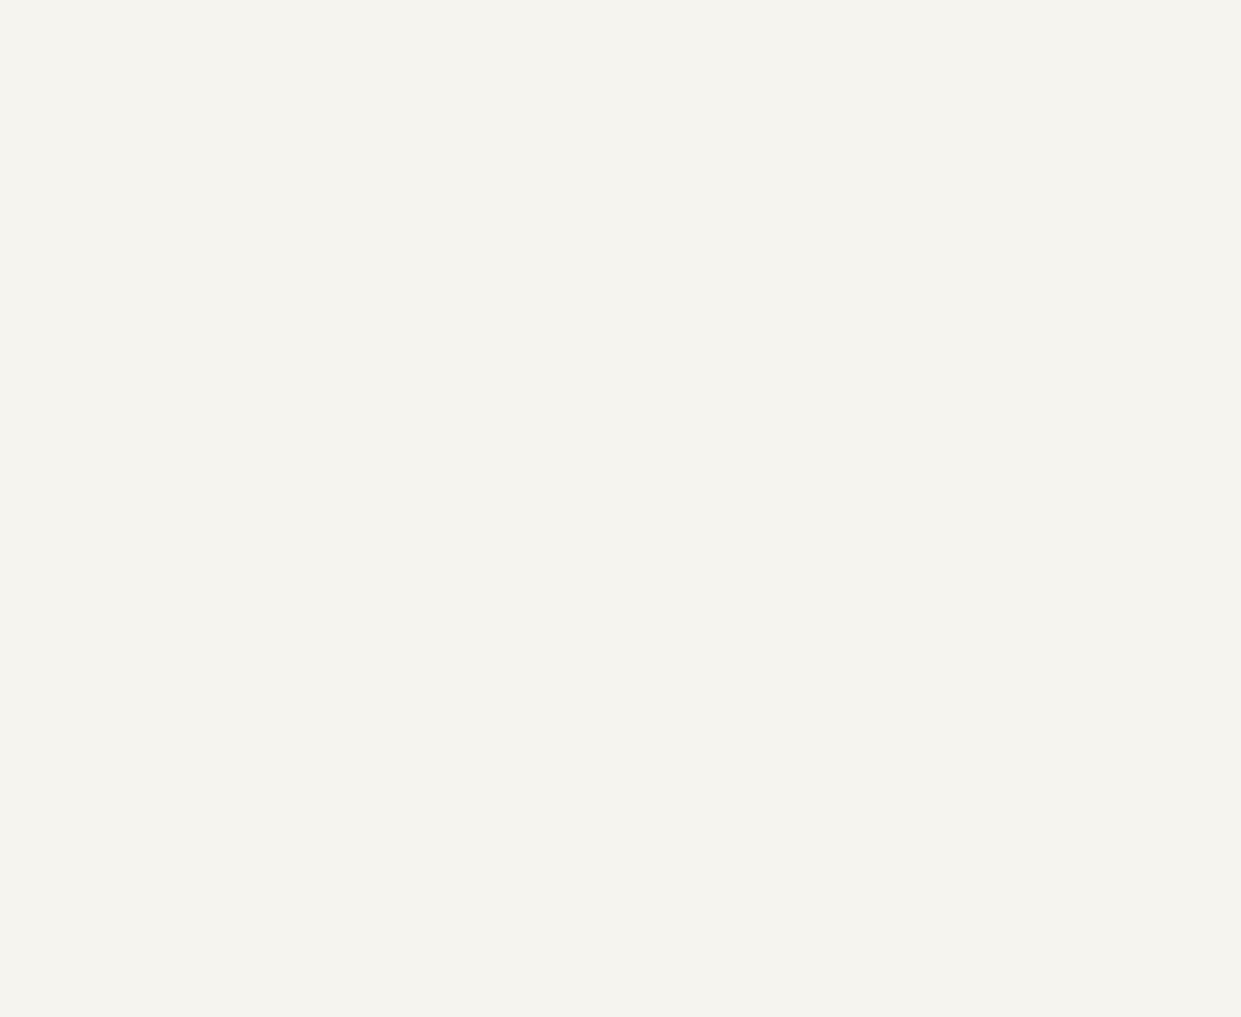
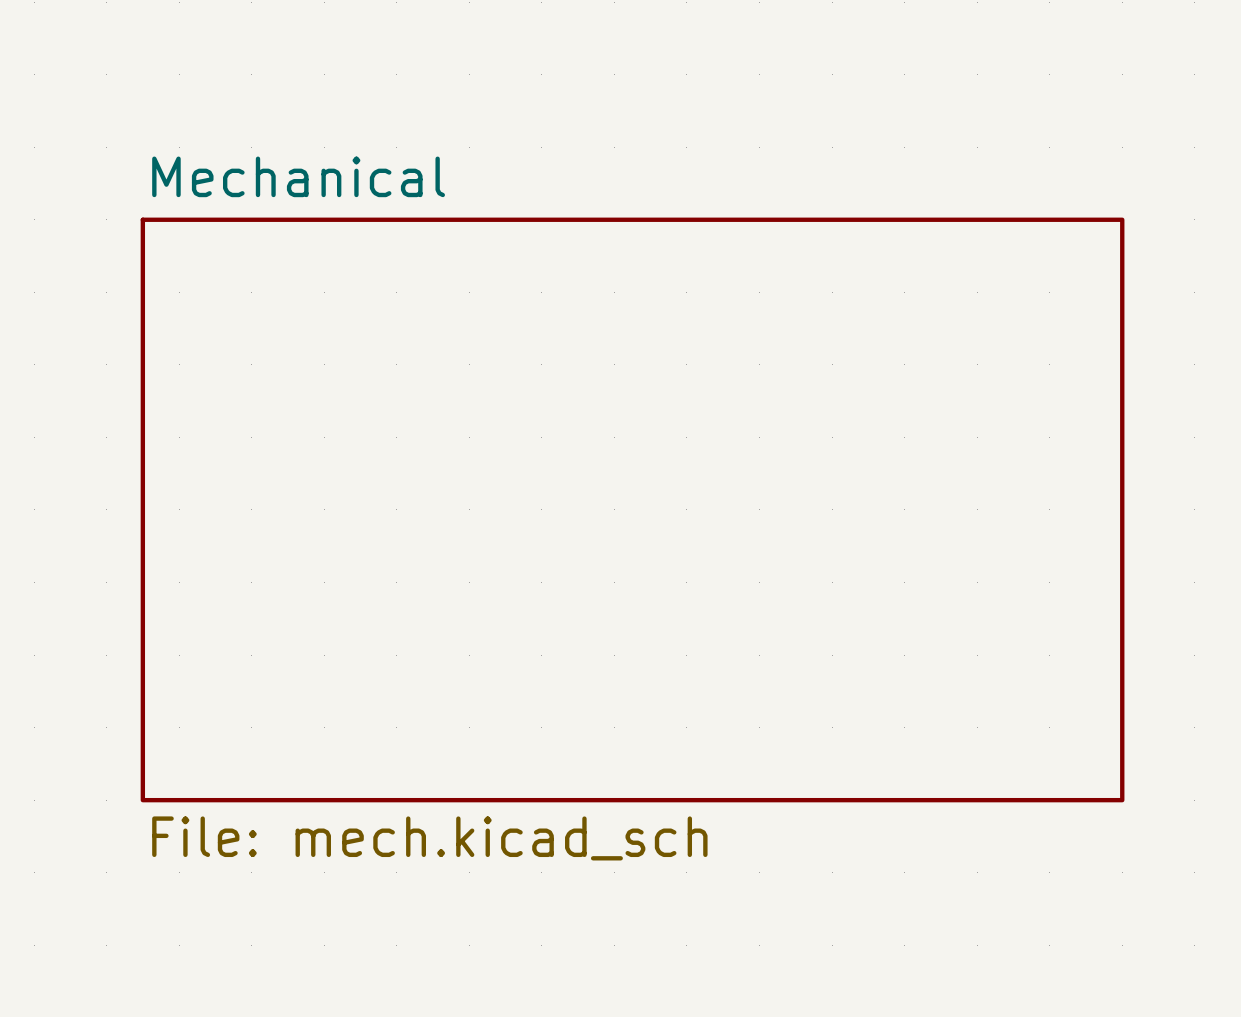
sheet Mechanical: none -> File: mech.kicad_sch (632, 509)

